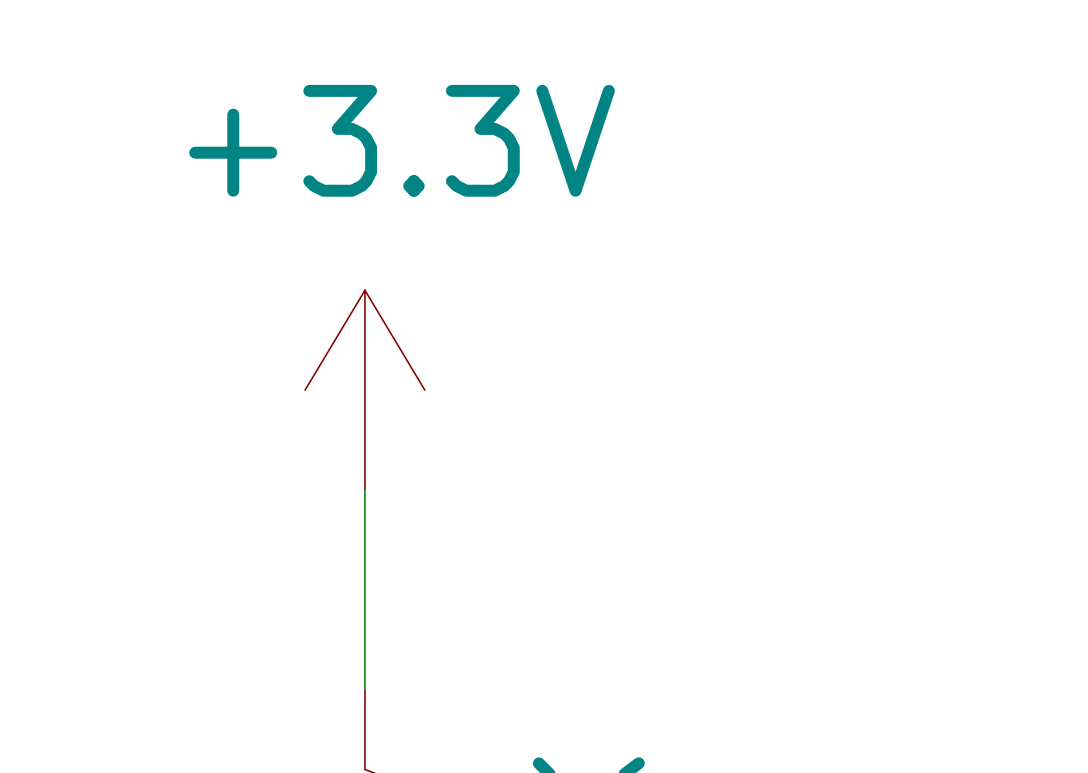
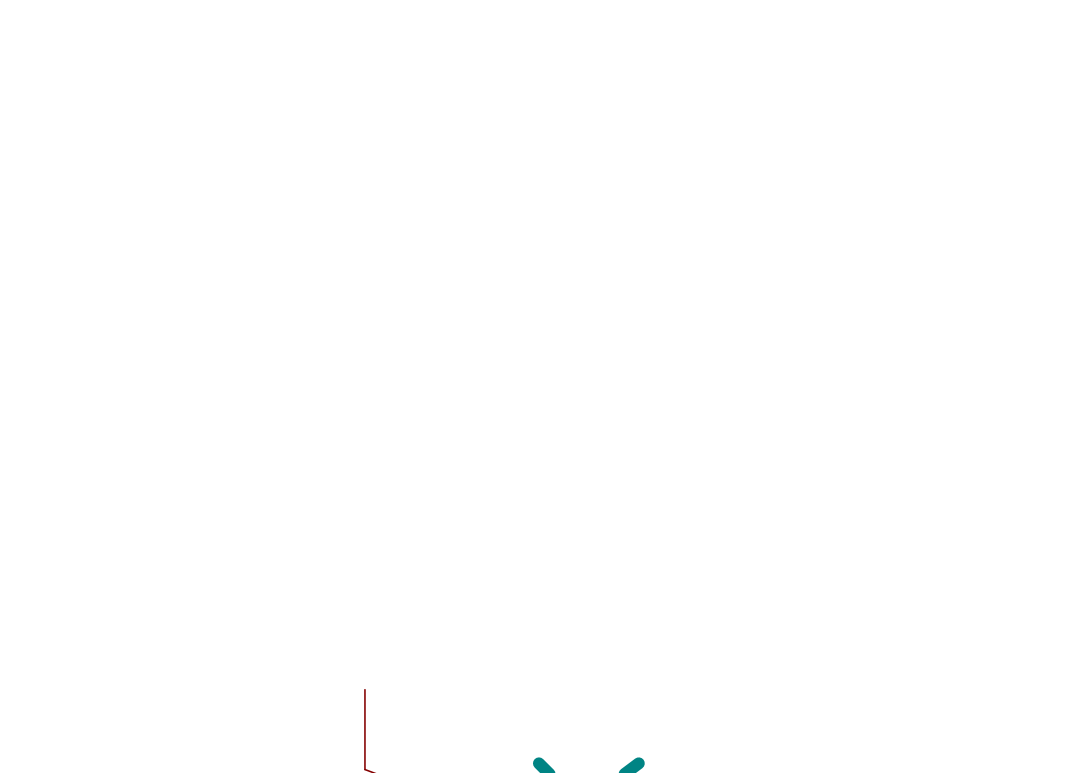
power symbol: +3.3V (364, 390) -> none
wire: (364, 489) (364, 689) -> none

